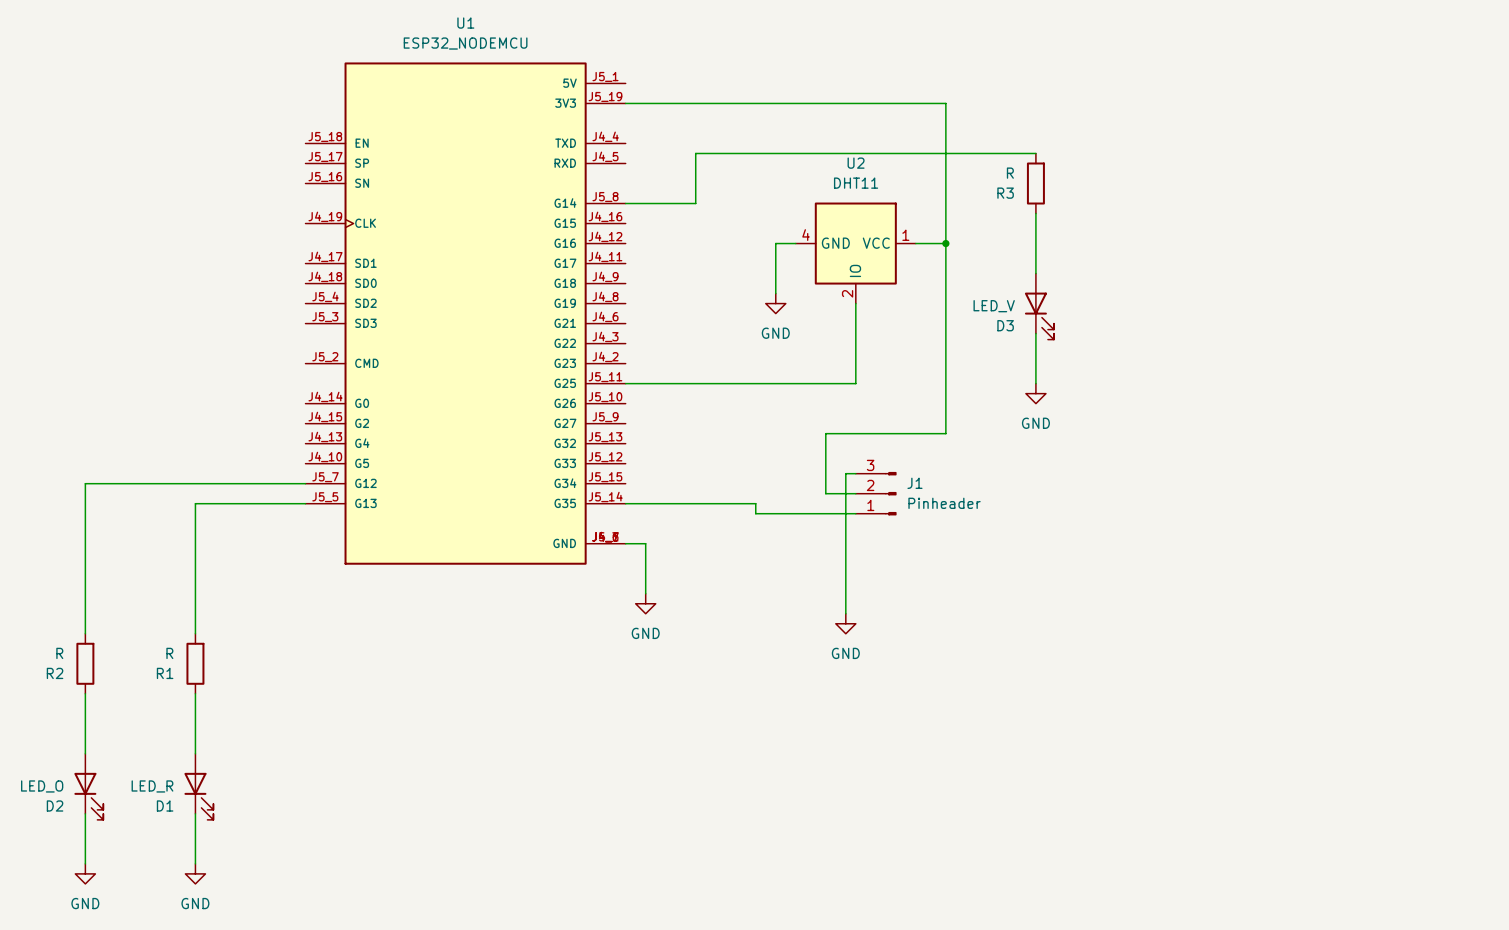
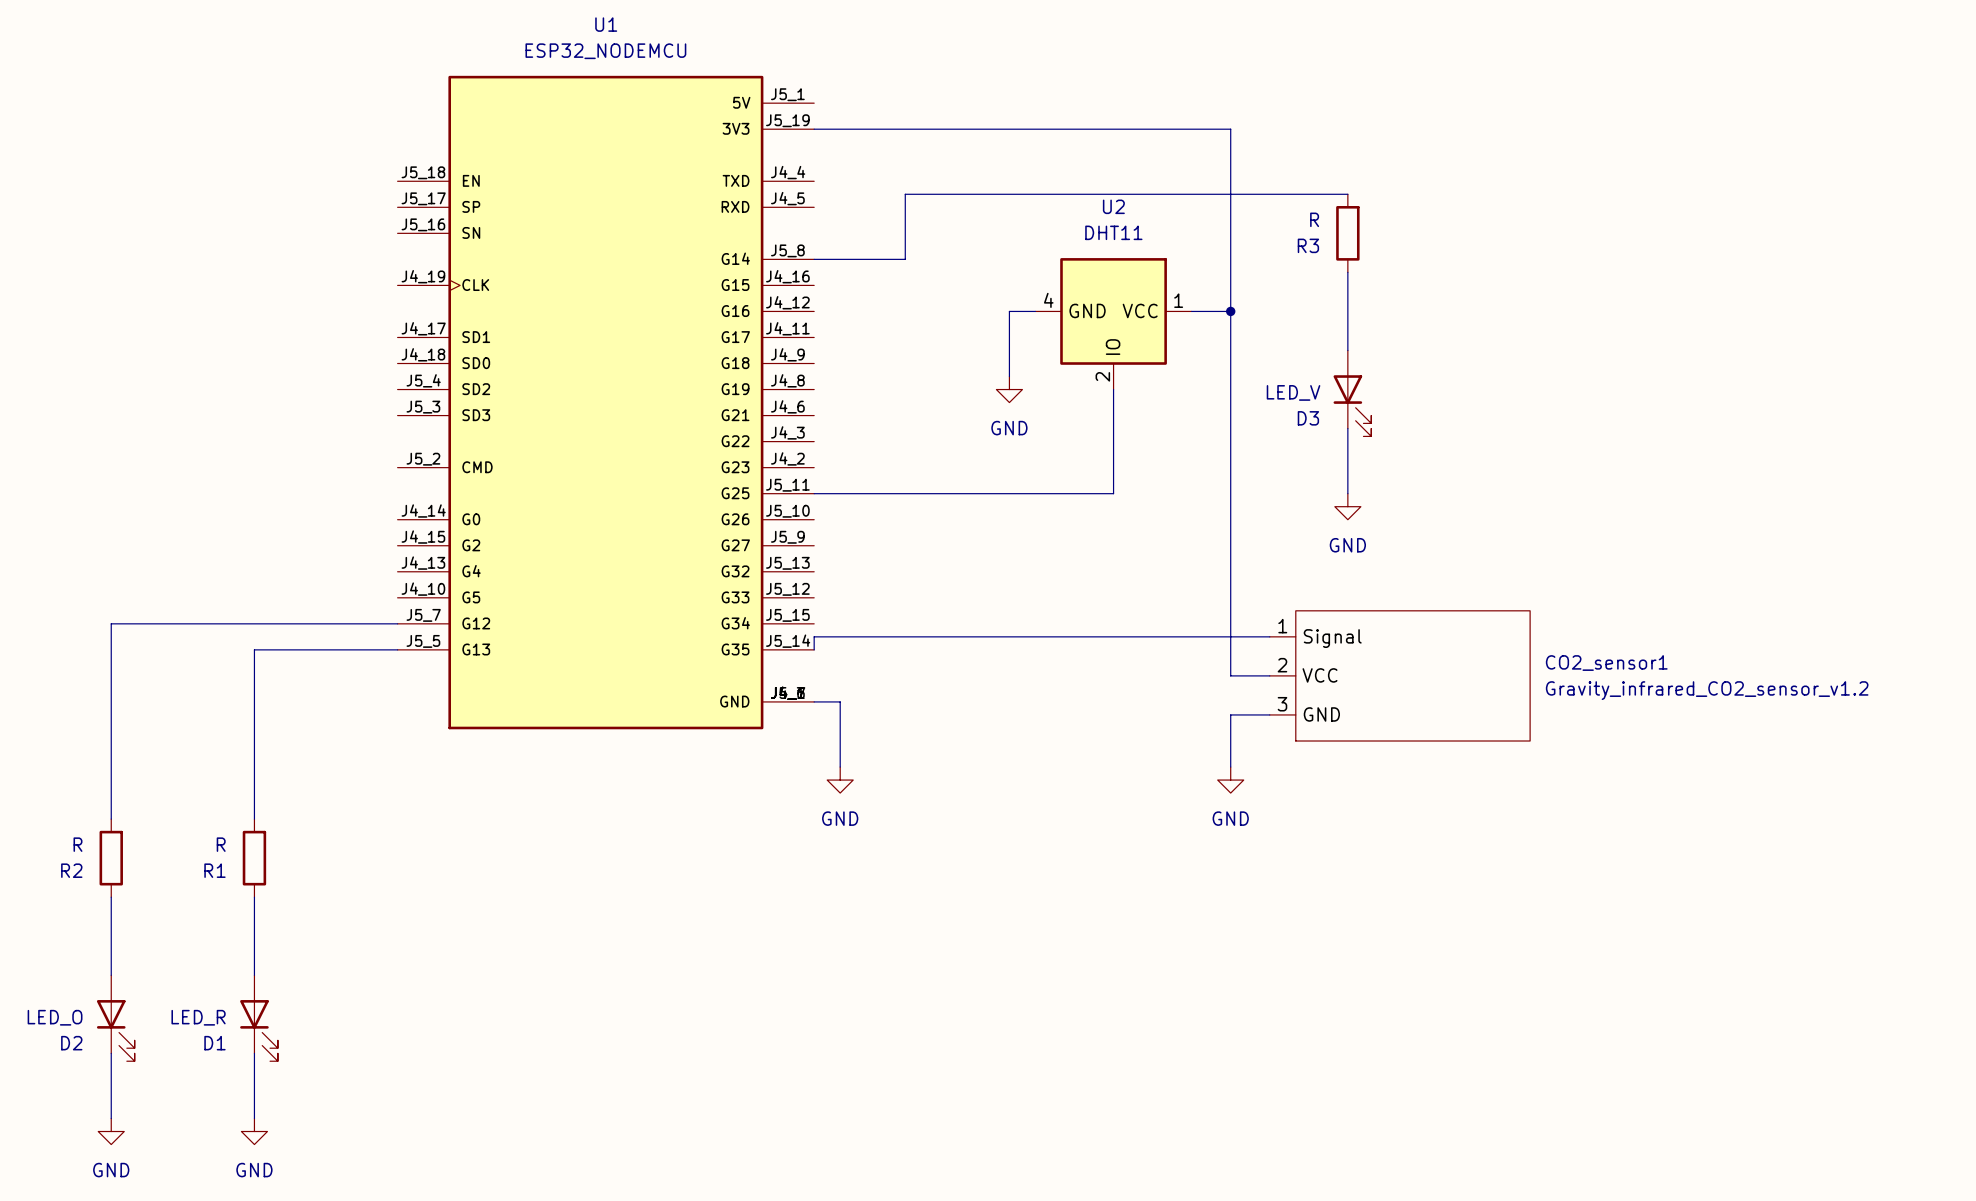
wire: (945, 433) (825, 433) (825, 493) -> (1230, 558) (1230, 675) (1269, 675)
wire: (855, 473) (845, 473) (845, 613) -> none
wire: none -> (1113, 636) (1269, 636)
J1: Pinheader (876, 493) -> none
wire: (625, 503) (755, 503) (755, 513) (855, 513) -> (814, 649) (814, 636) (1074, 636)
CO2_sensor1: none -> Gravity_infrared_CO2_sensor_v1.2 (1399, 675)
wire: none -> (1269, 714) (1230, 714) (1230, 767)
power symbol position: GND (845, 623) -> GND (1230, 780)

